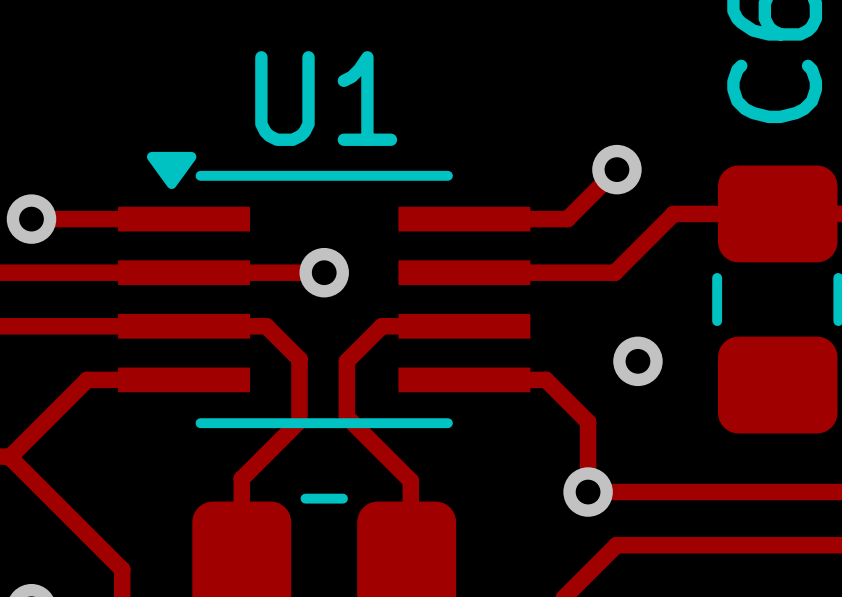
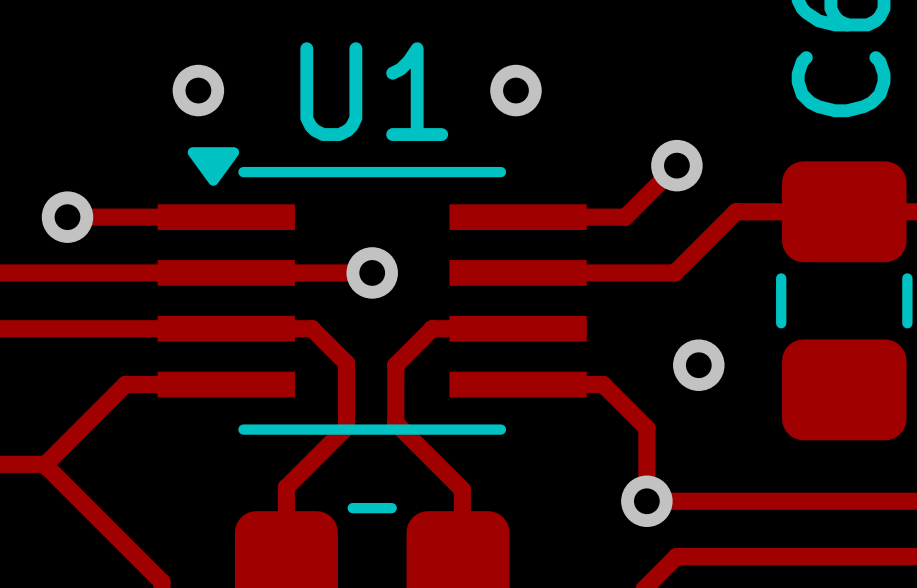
via: none -> (198, 90)
via: none -> (515, 90)

